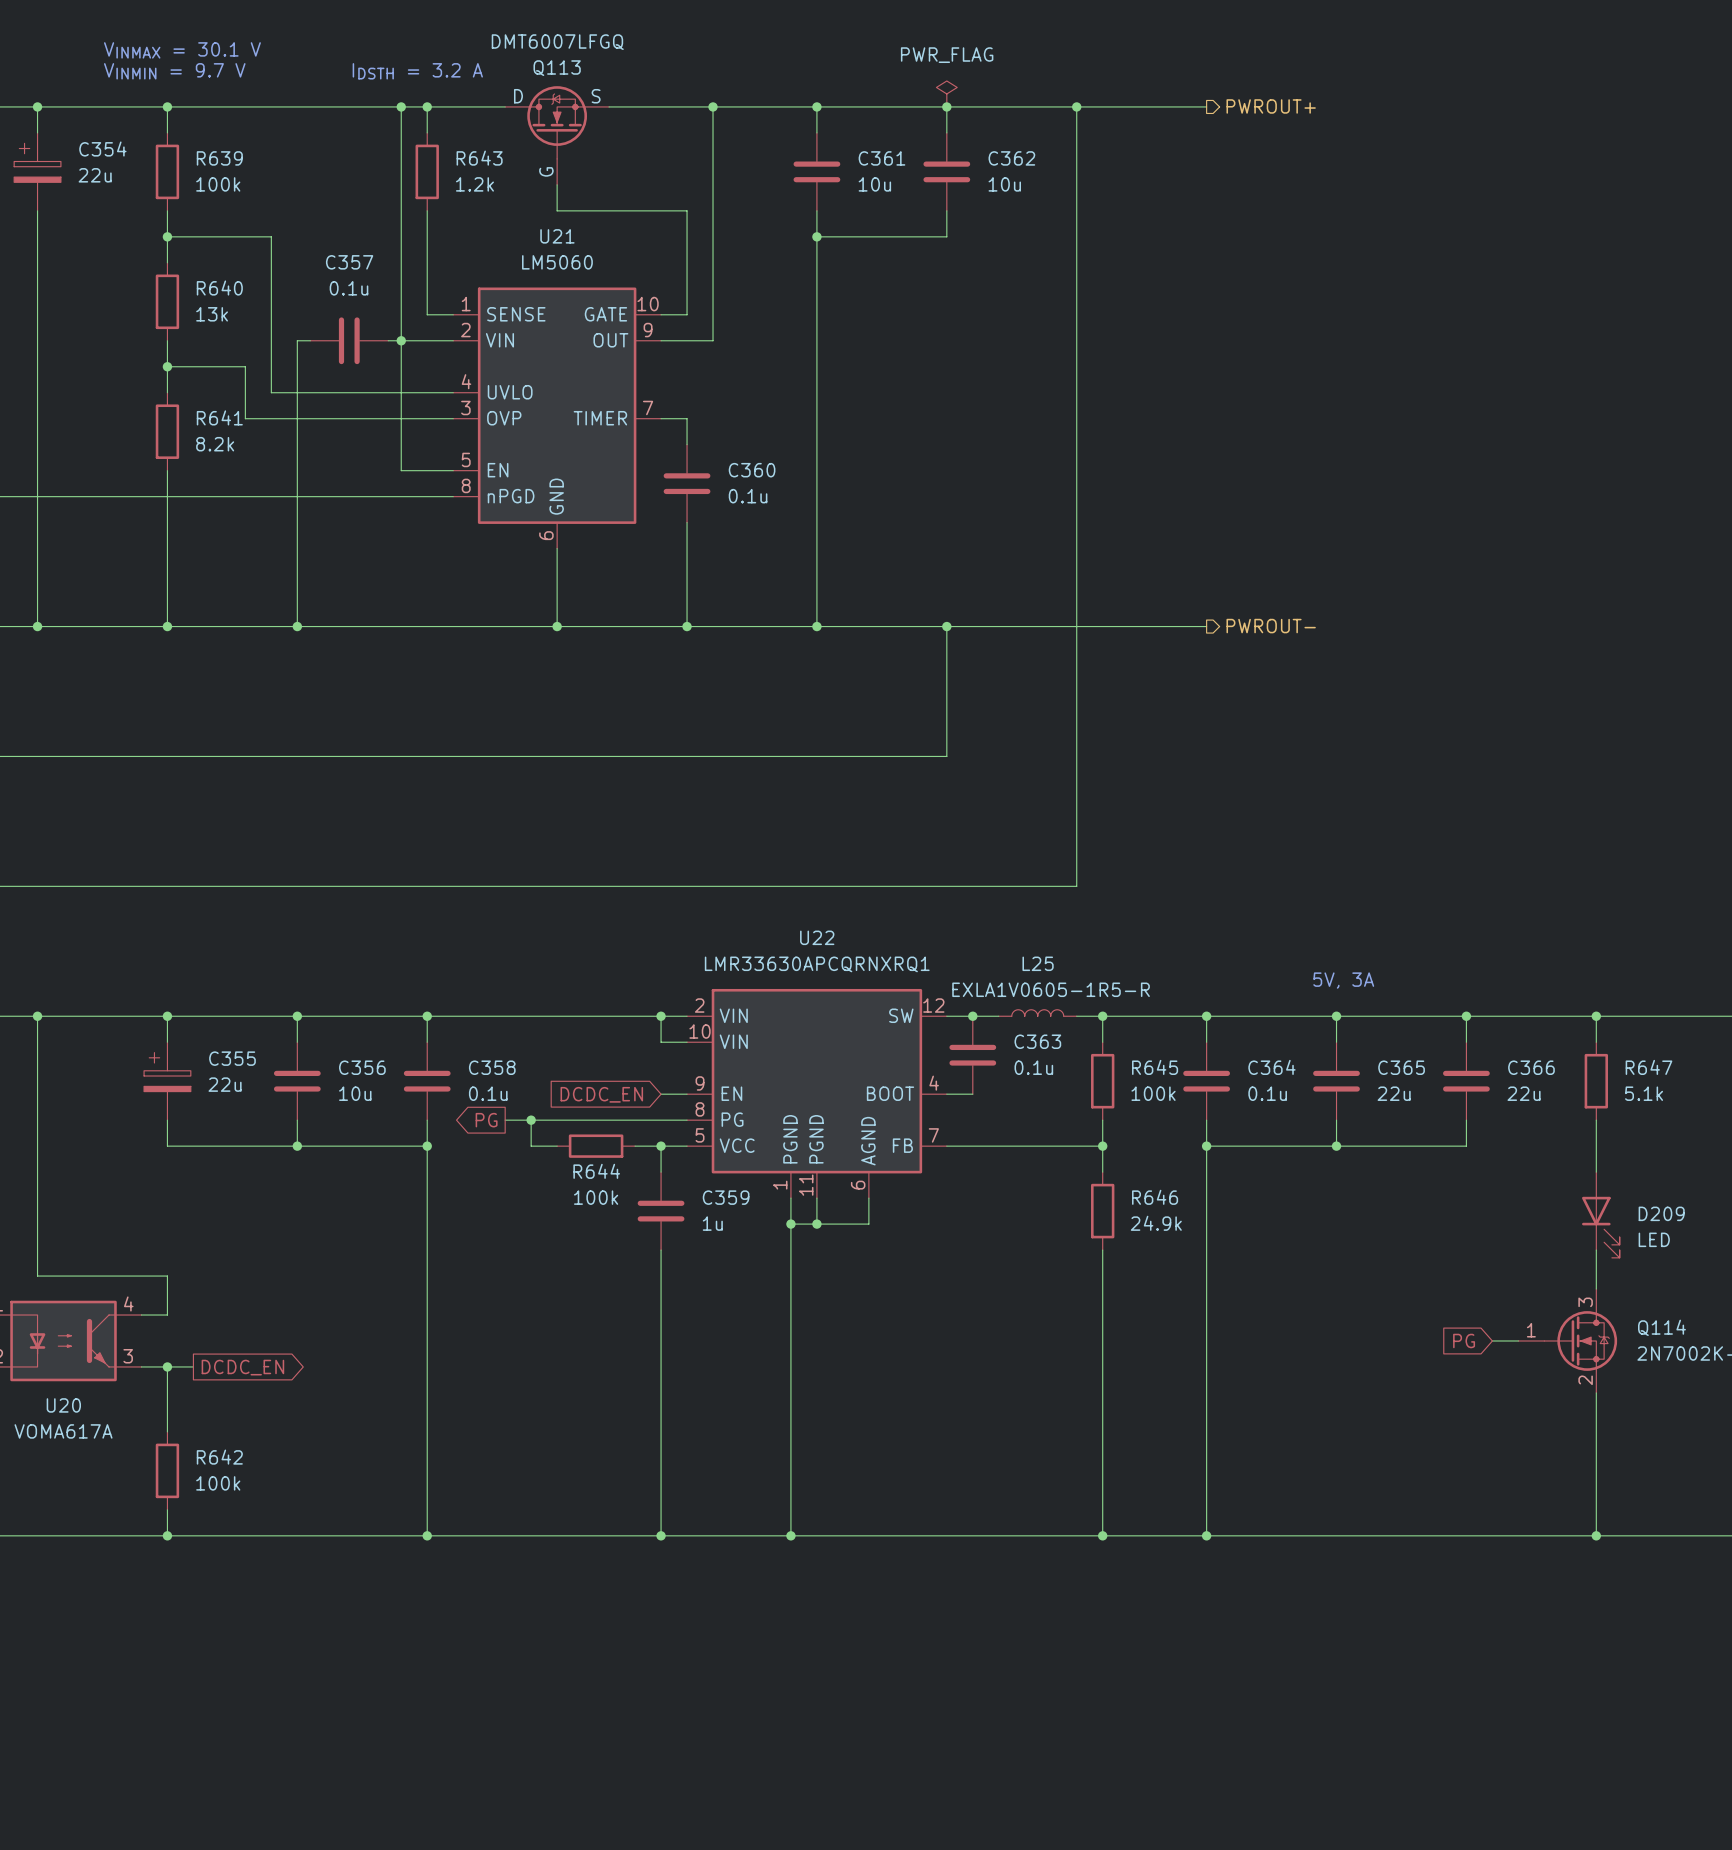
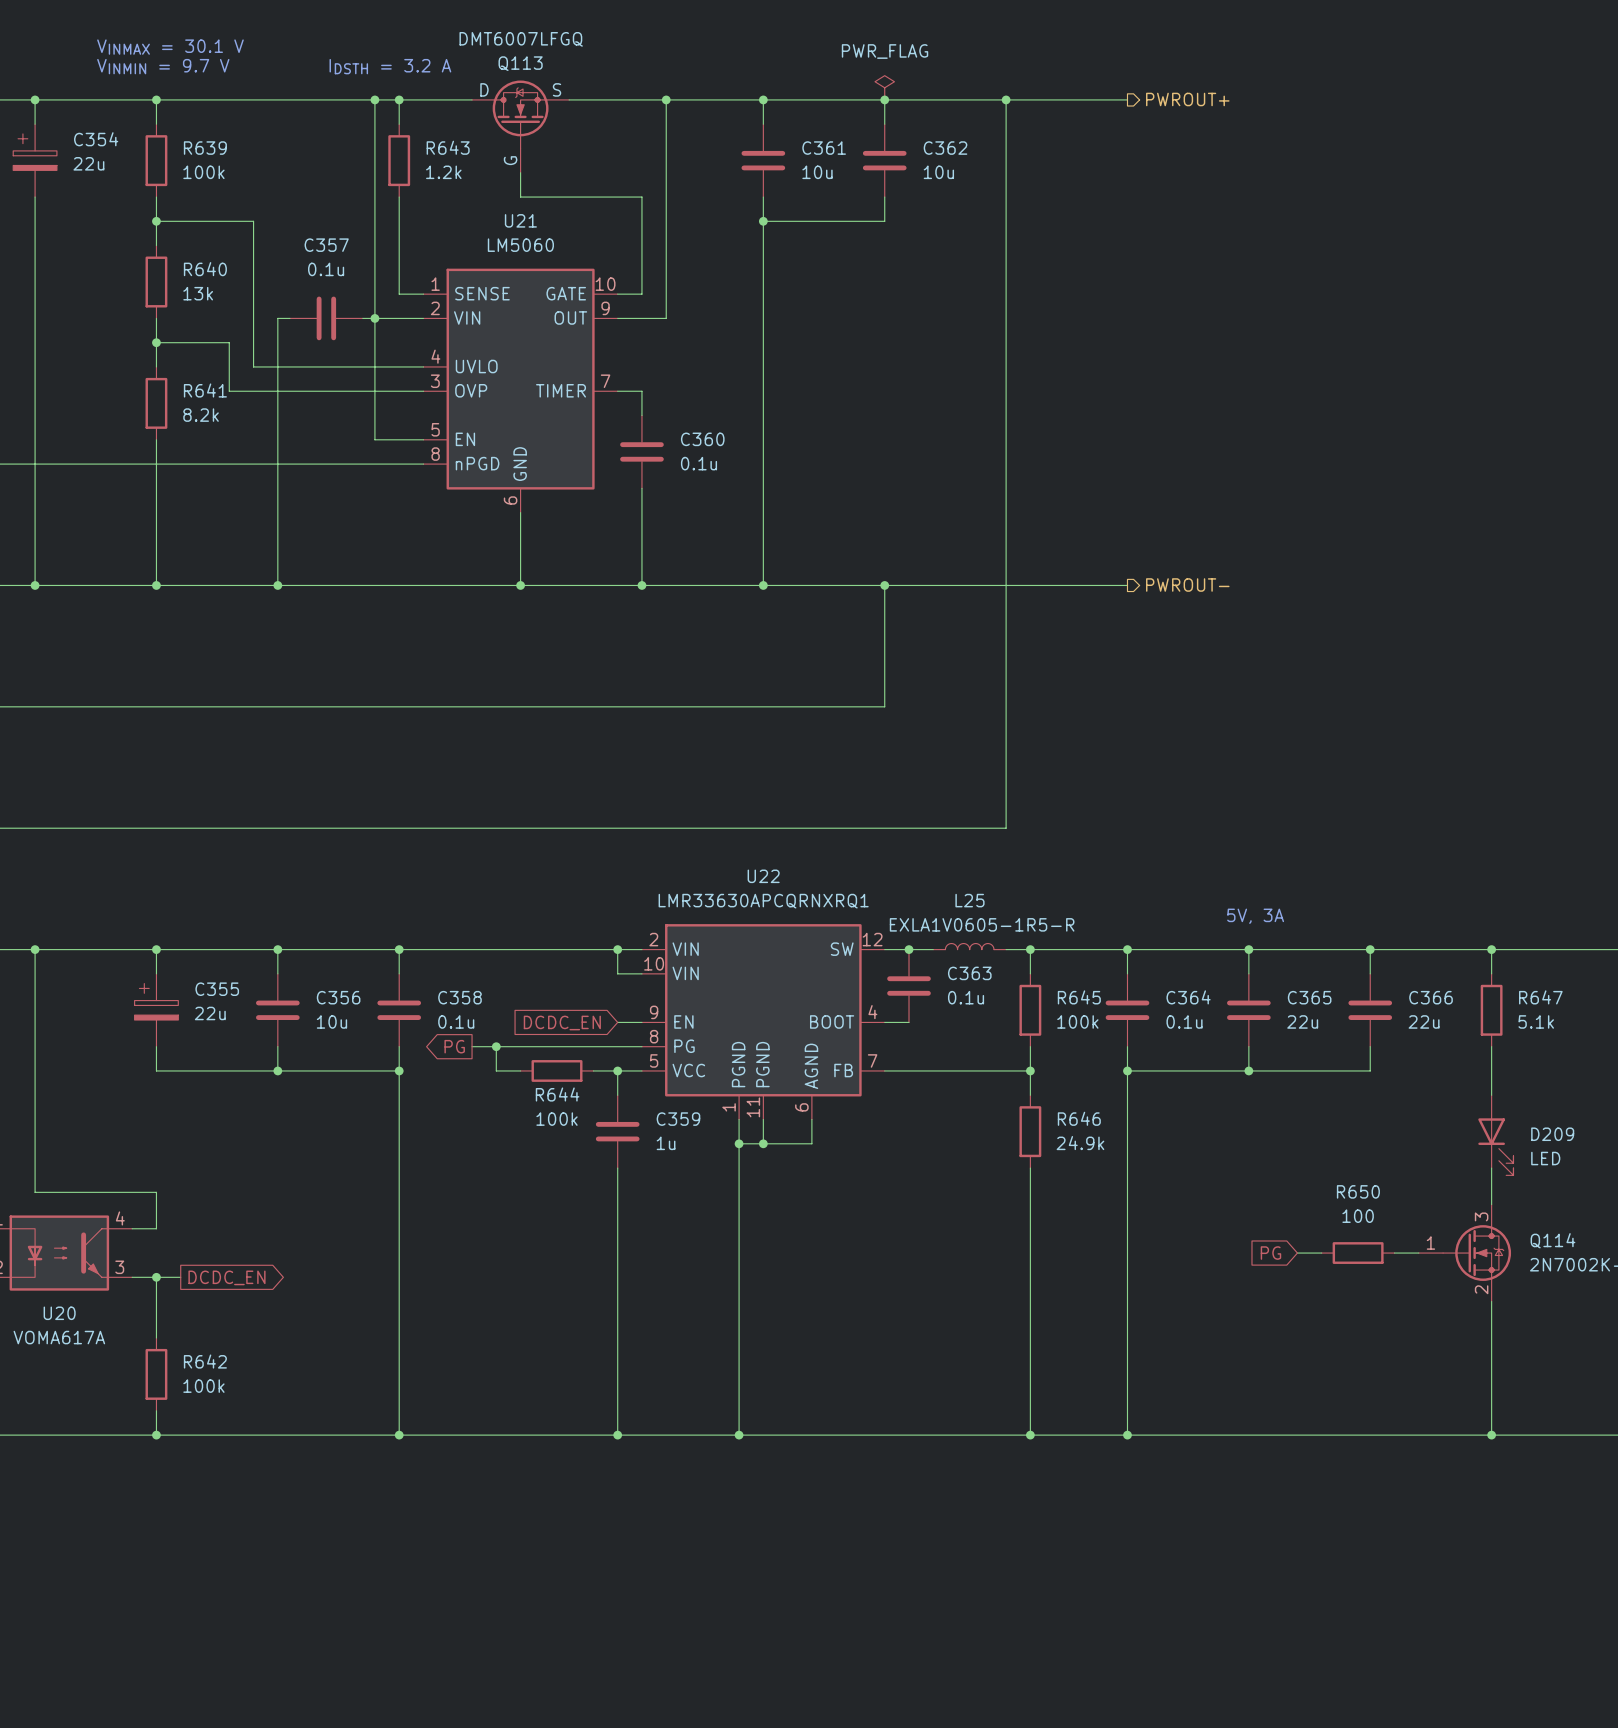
wire: none -> (1297, 1253) (1321, 1253)
R650: none -> 100 (1358, 1253)
global label position: PG (1464, 1340) -> PG (1270, 1253)

